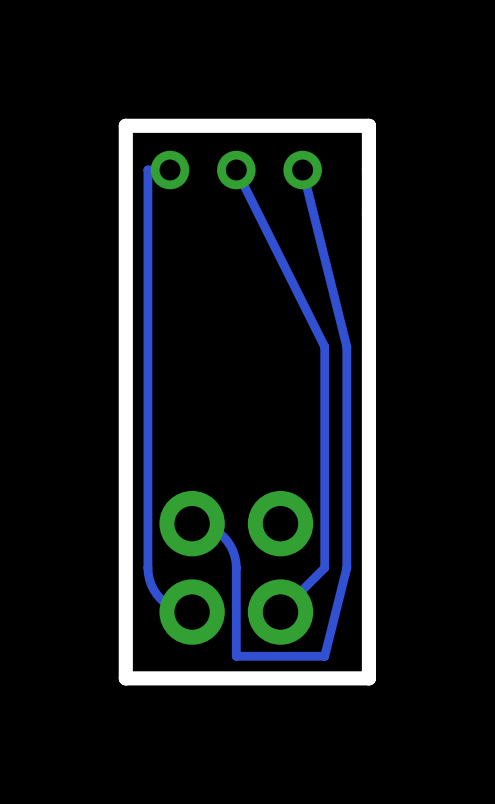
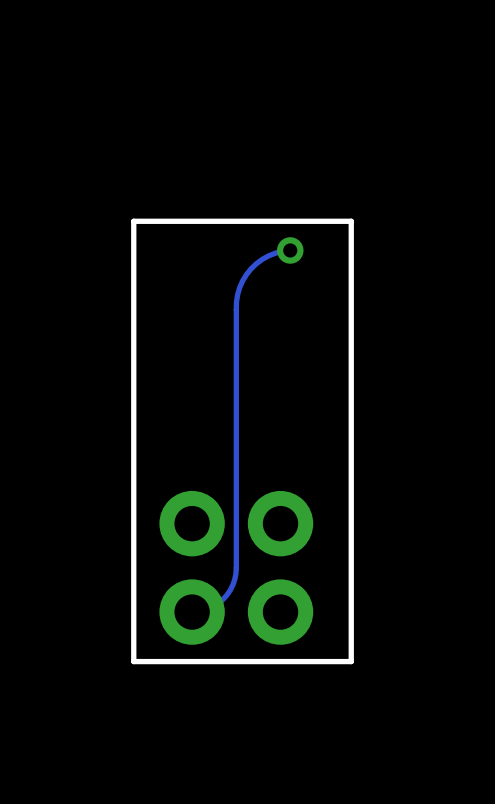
board edge: (368, 125) (368, 678) (125, 678) (125, 125) (368, 125) -> (351, 221) (351, 661) (133, 661) (133, 221) (351, 221)
track: (170, 170) (147, 170) (147, 567) (151, 584) (160, 599) (175, 608) (192, 612) -> (290, 250) (268, 255) (256, 263) (246, 274) (237, 294) (235, 573) (230, 589) (219, 602) (203, 610) (192, 612)
via: (170, 170) -> none
track: (236, 170) (324, 346) (324, 567) (280, 612) -> none
via: (236, 170) -> none
track: (302, 170) (346, 346) (346, 567) (324, 656) (236, 656) (234, 556) (230, 545) (219, 532) (203, 525) (192, 523) -> none
via: (302, 170) -> none
via: none -> (290, 250)

